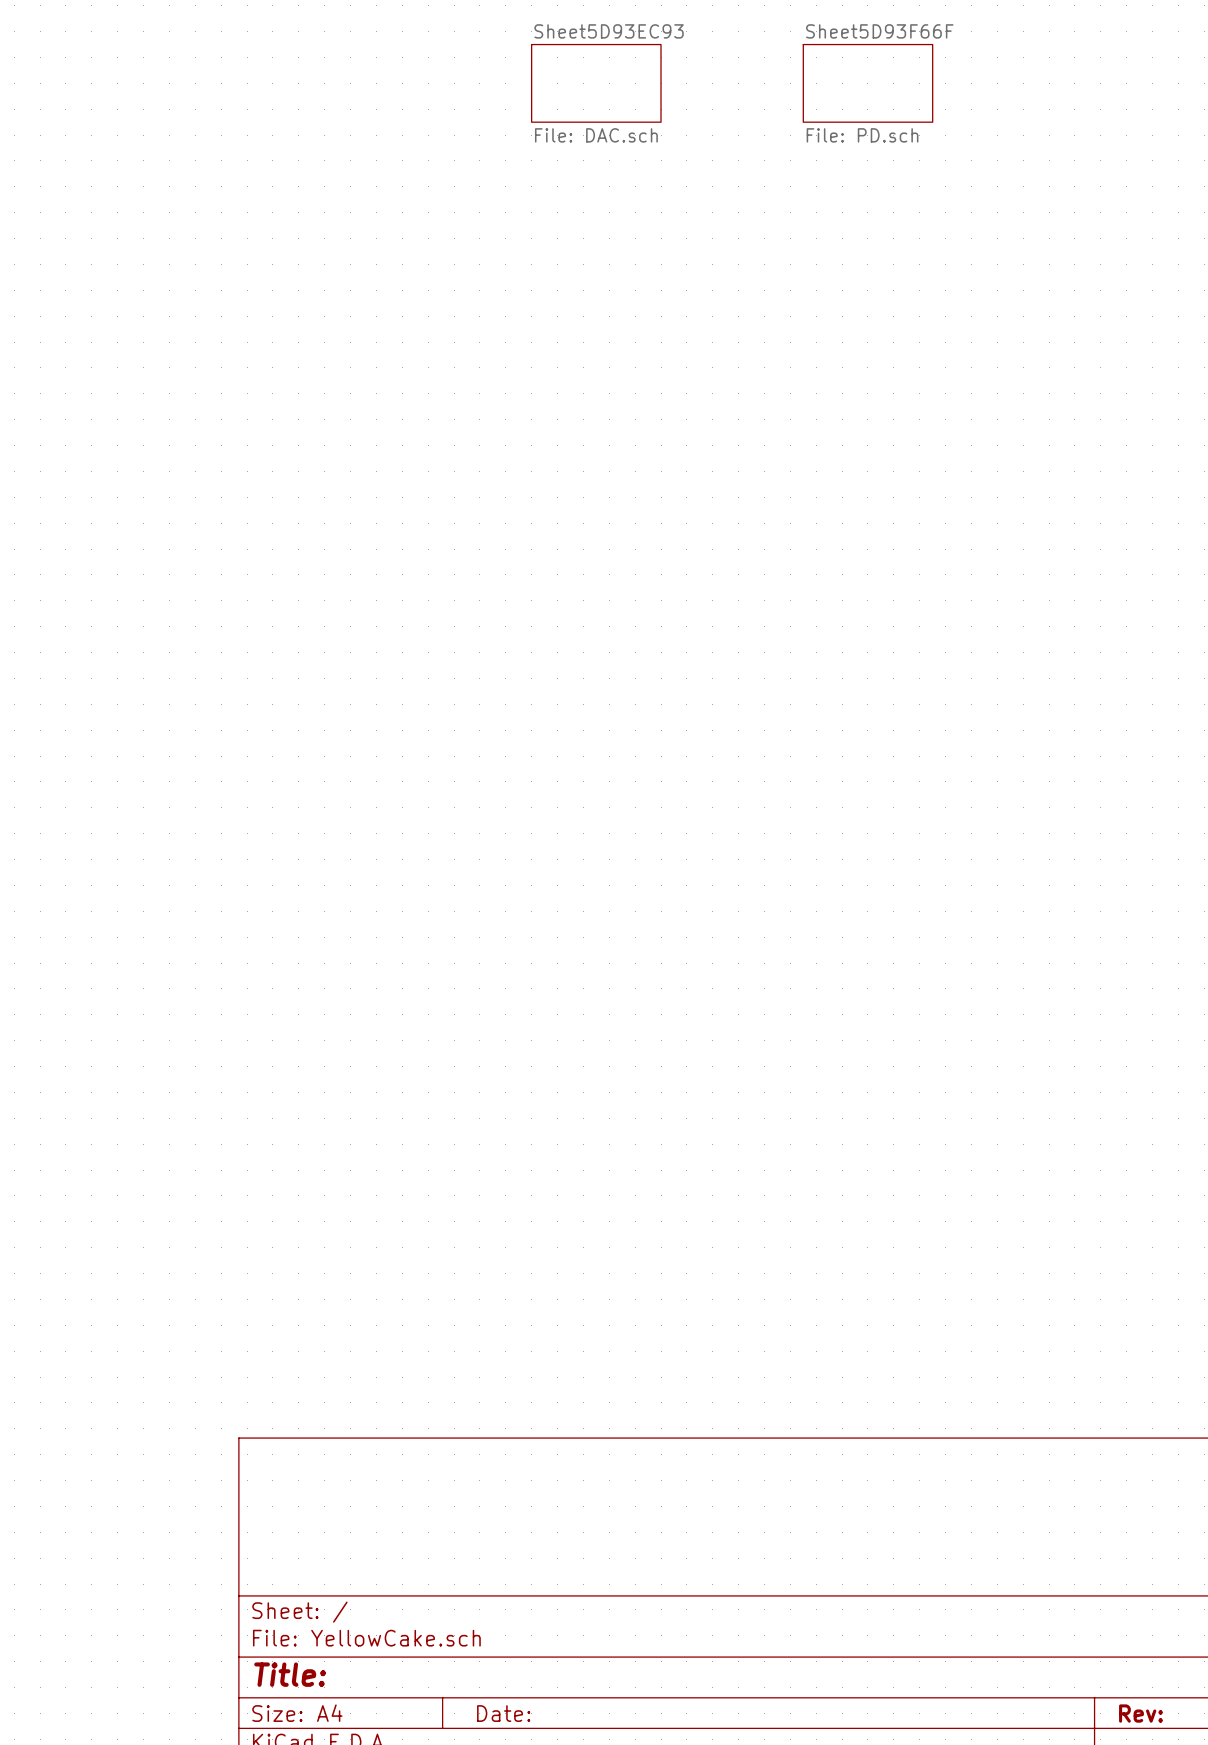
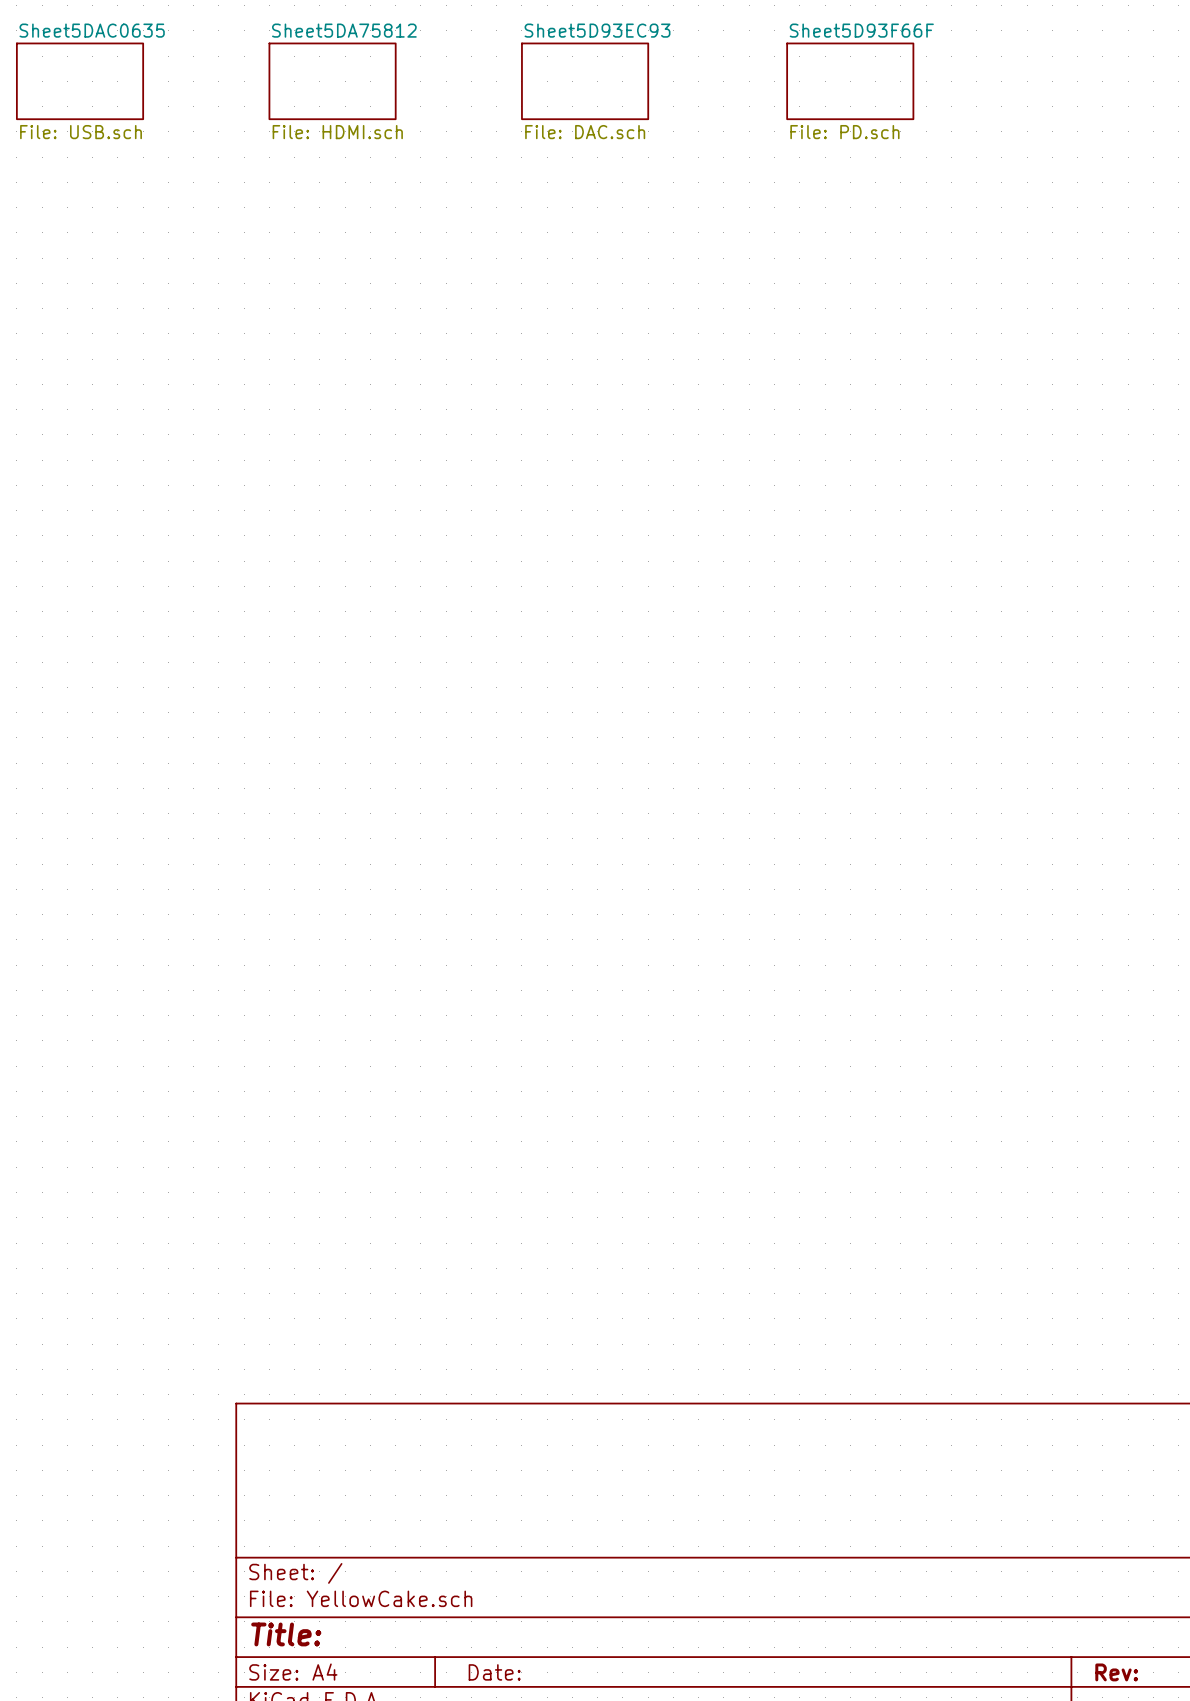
sheet Sheet5DAC0635: none -> File: USB.sch (80, 81)
sheet Sheet5DA75812: none -> File: HDMI.sch (332, 81)

